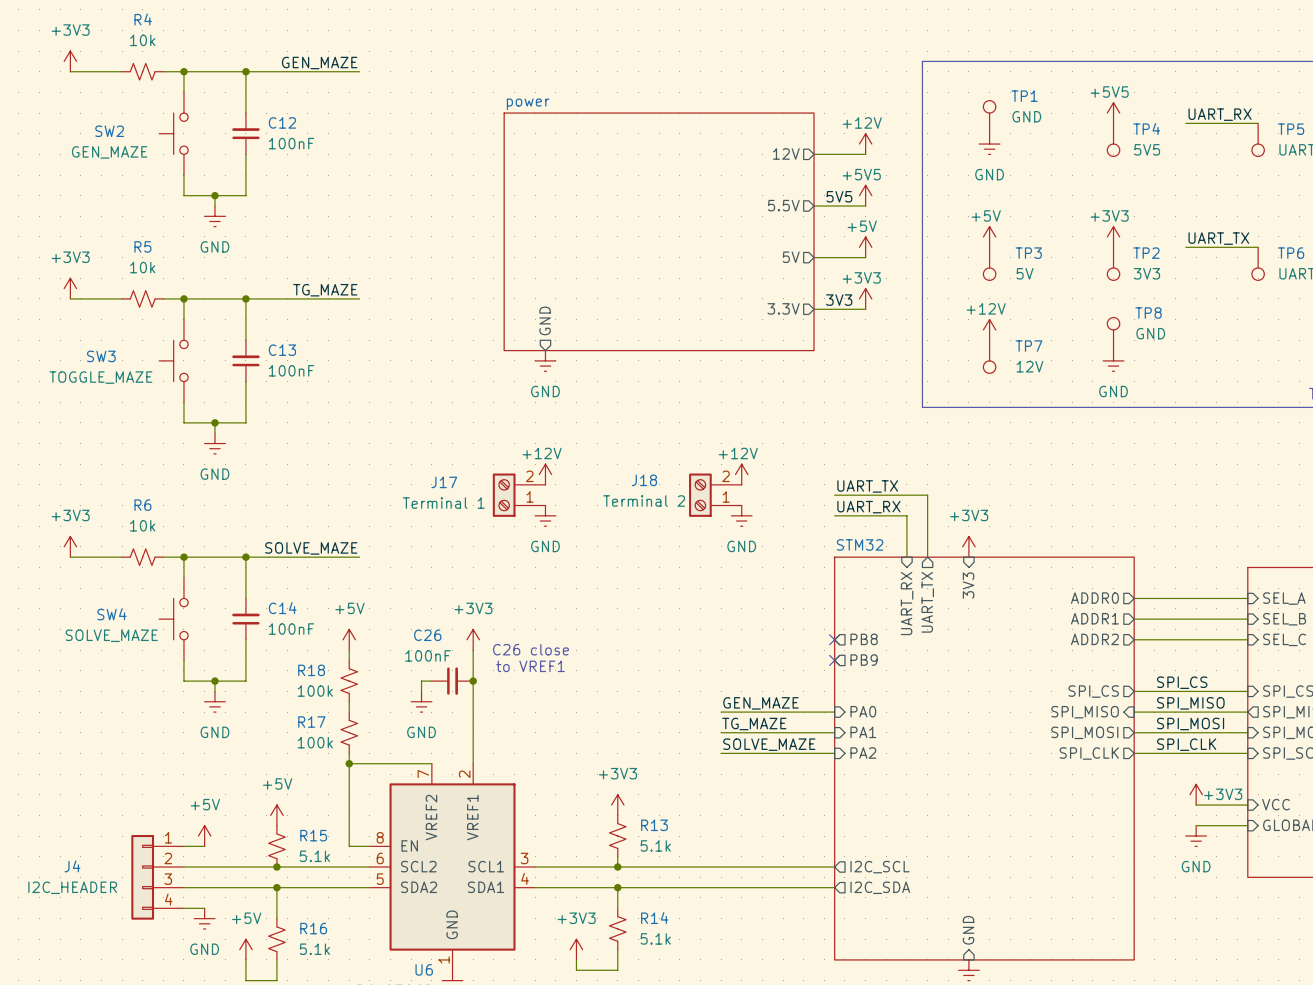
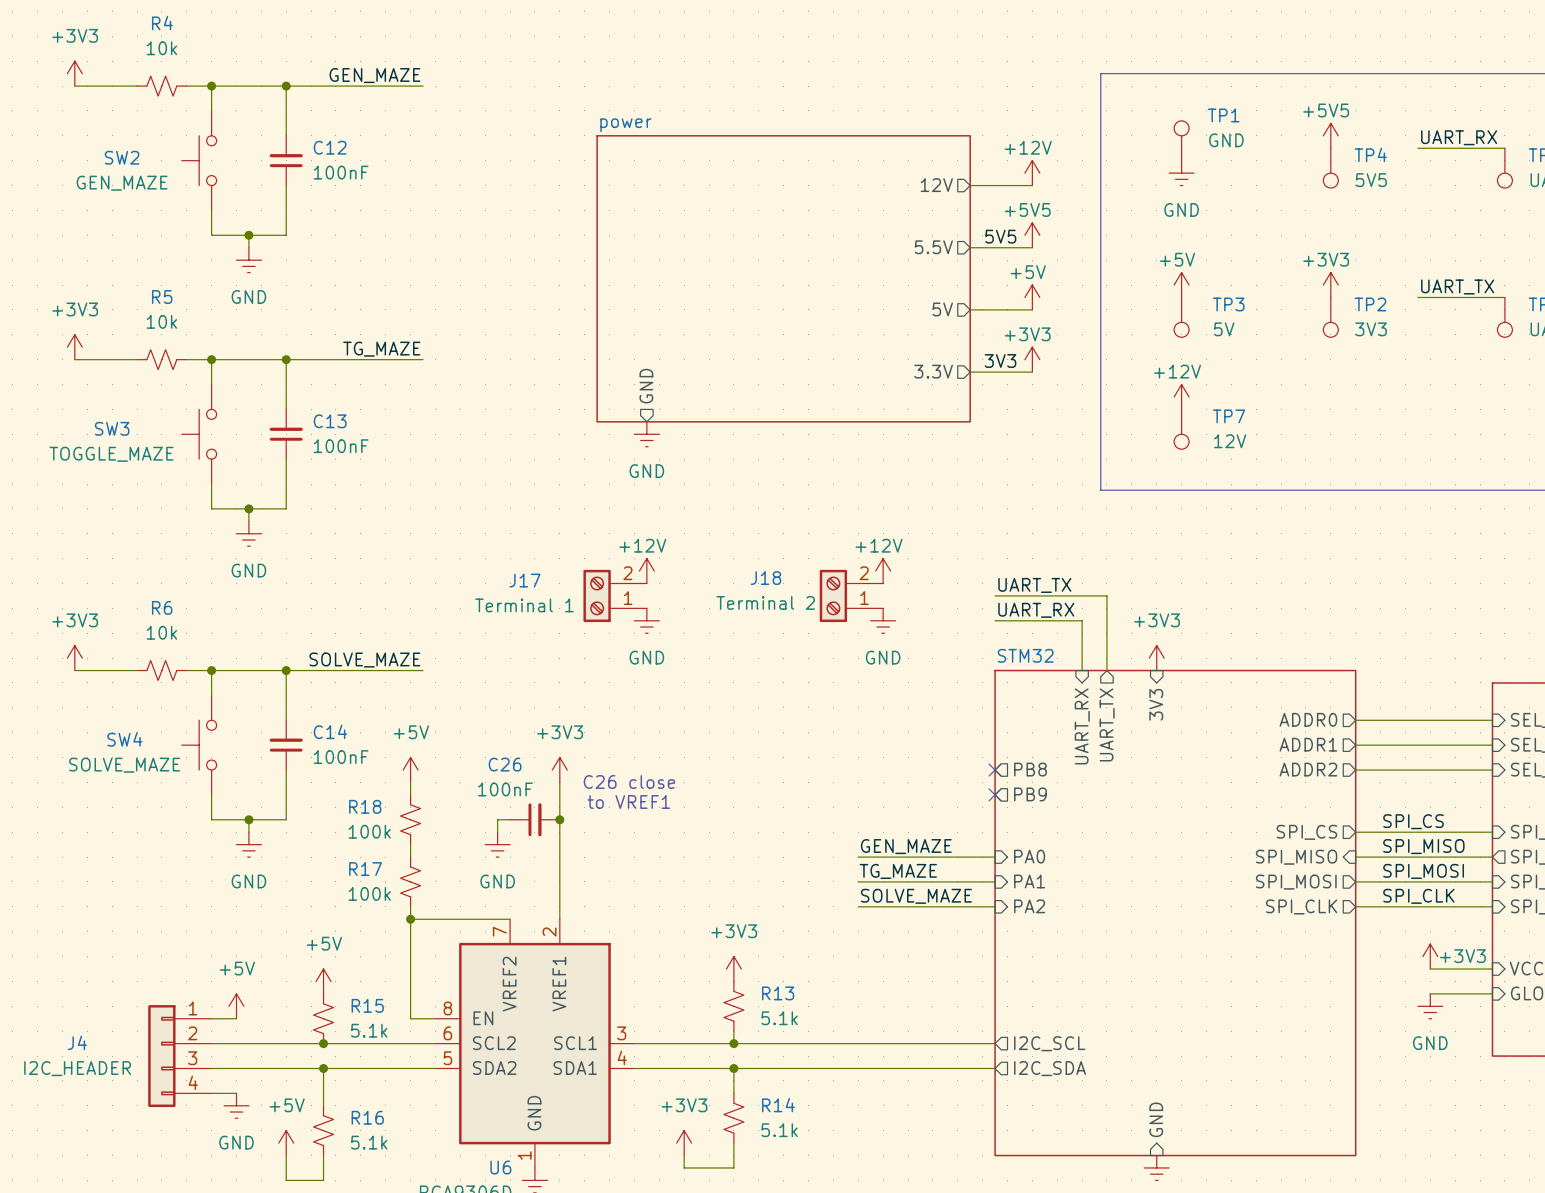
TP8: GND (1113, 334) -> none
power symbol: GND (1113, 360) -> none

